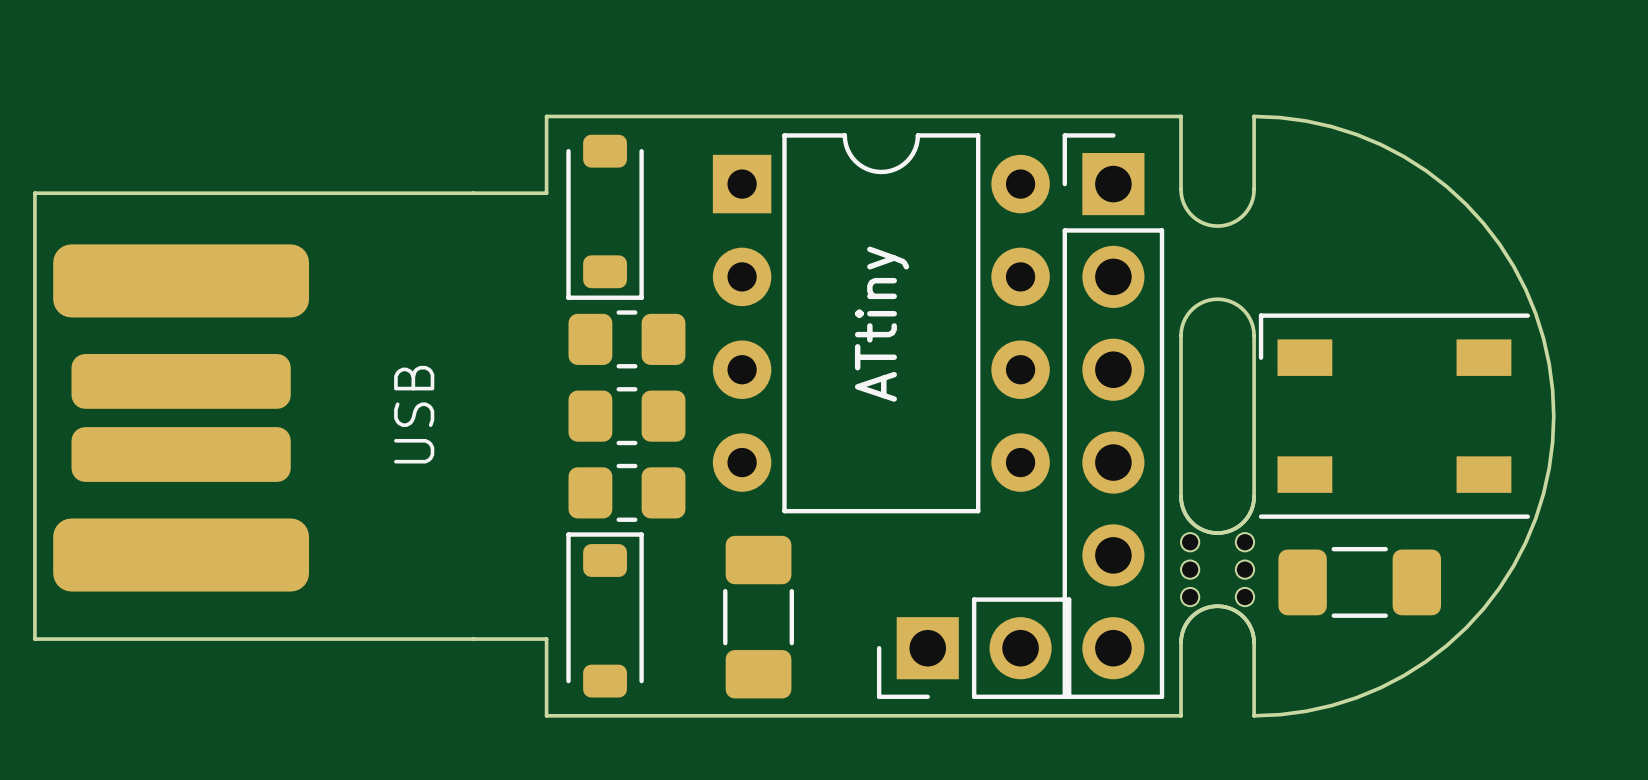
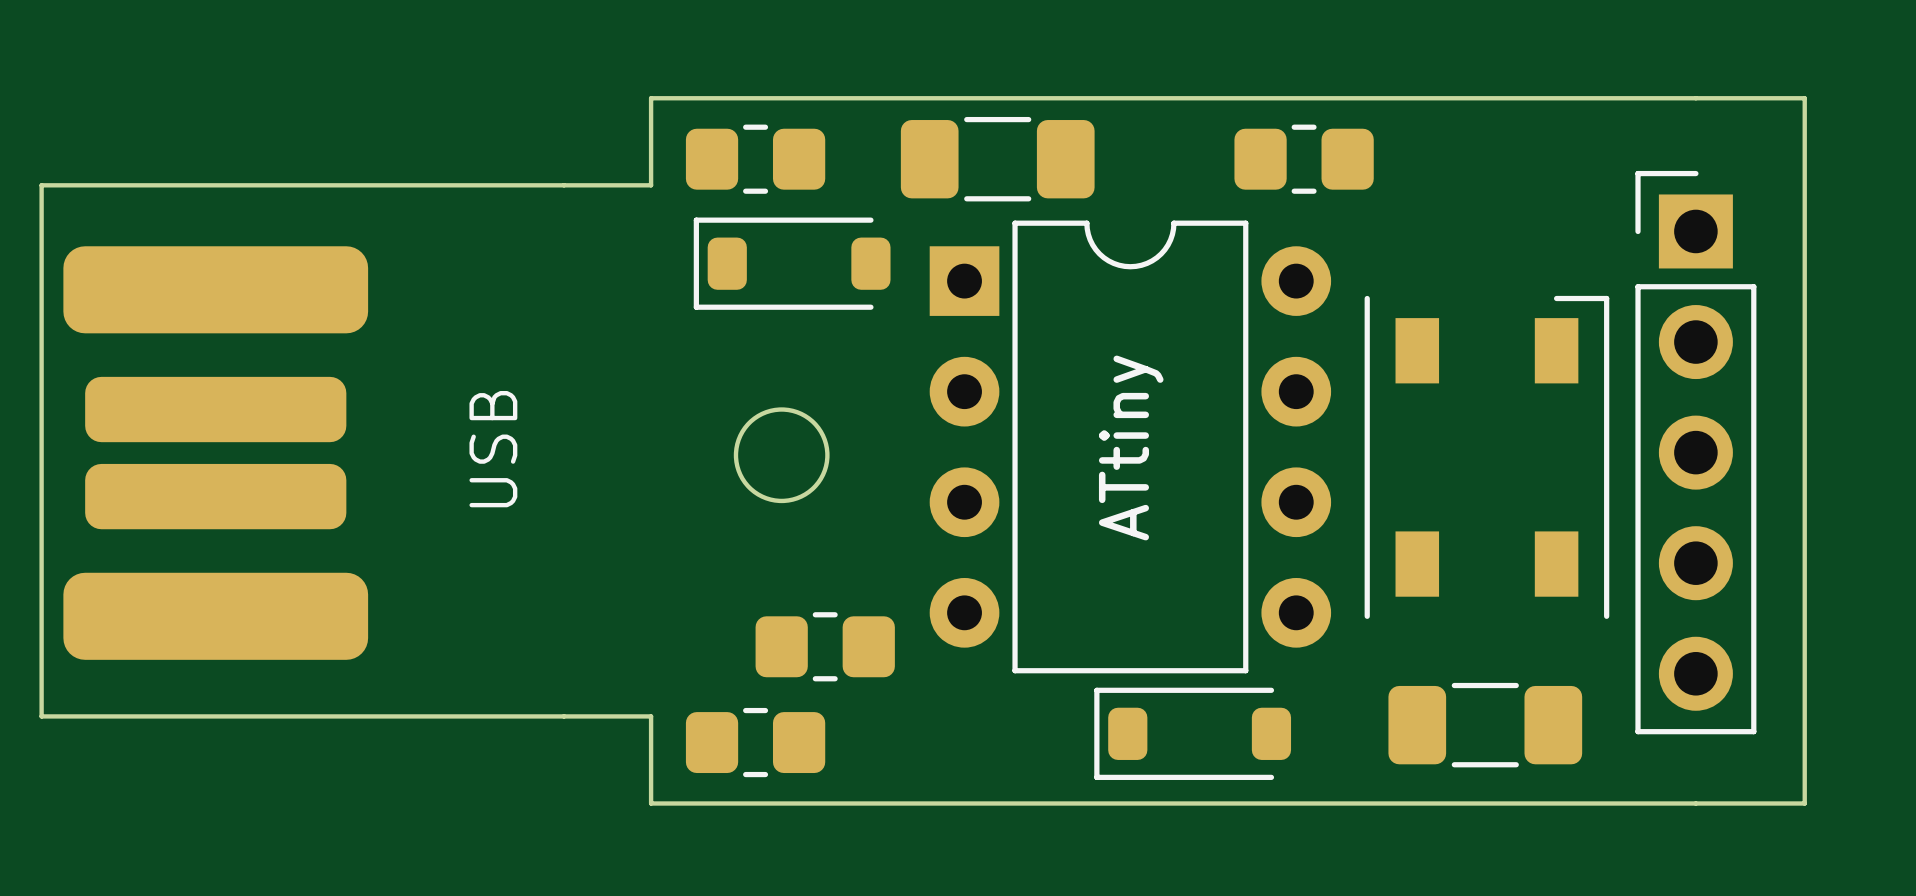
board edge: (546, 120) (546, 116) (1181, 116) (1181, 189) (1183, 202) (1190, 213) (1196, 219) (1204, 223) (1217, 226) (1230, 223) (1238, 219) (1244, 213) (1251, 202) (1254, 189) (1254, 116) (1280, 117) (1331, 126) (1380, 144) (1425, 170) (1466, 204) (1483, 223) (1513, 266) (1535, 313) (1549, 364) (1553, 416) (1549, 468) (1535, 518) (1513, 565) (1483, 608) (1466, 628) (1425, 661) (1380, 687) (1331, 705) (1306, 711) (1254, 715) (1254, 642) (1251, 629) (1244, 618) (1238, 612) (1226, 607) (1217, 606) (1208, 607) (1196, 612) (1190, 618) (1183, 629) (1181, 642) (1181, 715) (546, 715) (546, 712) -> (651, 98) (1804, 98) (1804, 803) (651, 803)
part: none -> (755, 159)
part: none -> (997, 159)
part: none -> (1304, 159)
part rotation: 0° (605, 217) -> 90° clockwise (792, 263)
part footprint: [1258, 313, 1531, 519] -> [1635, 170, 1757, 735]
part position: (881, 323) -> (1130, 446)
board edge: (1181, 335) (1182, 505) (1187, 517) (1196, 526) (1208, 532) (1226, 532) (1238, 526) (1244, 520) (1251, 509) (1253, 500) (1253, 326) (1247, 314) (1238, 305) (1226, 300) (1213, 299) (1200, 303) (1190, 311) (1183, 322) (1181, 335) -> none
part: (626, 339) -> none
round board edge: none -> [733, 407, 830, 504]
part: (626, 416) -> none
part: (1113, 416) -> none
part: none -> (1486, 457)
part: (626, 492) -> none
part: (1217, 569) -> none
part: none -> (825, 646)
part position: (1359, 582) -> (1485, 725)
part footprint: [876, 597, 1072, 700] -> [1094, 687, 1292, 780]
part: (605, 614) -> none
part: (758, 617) -> none
part: none -> (755, 742)

